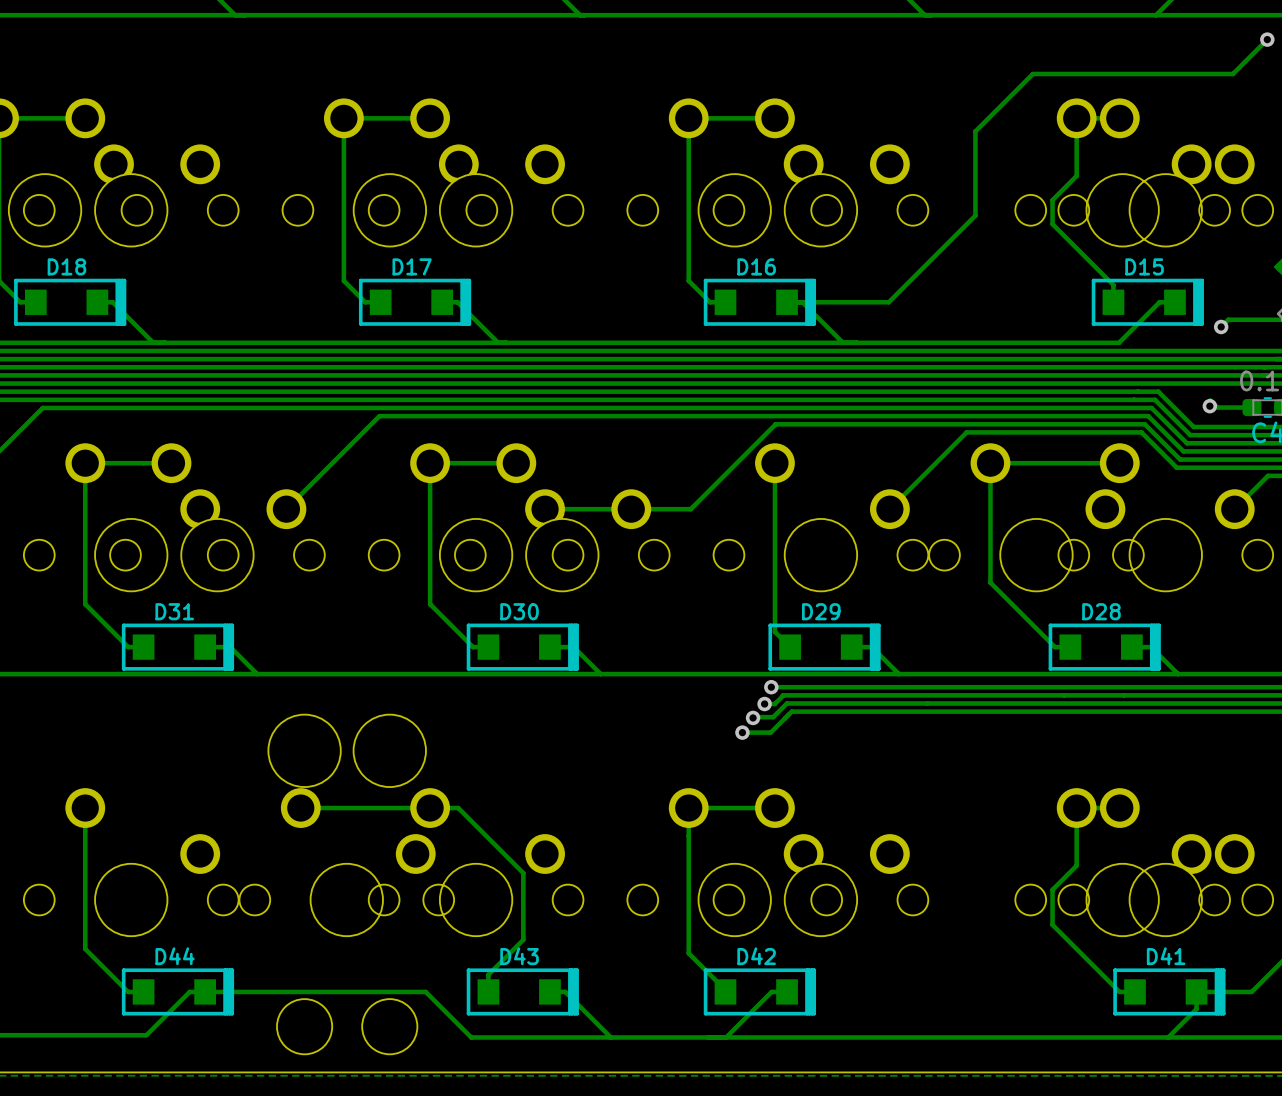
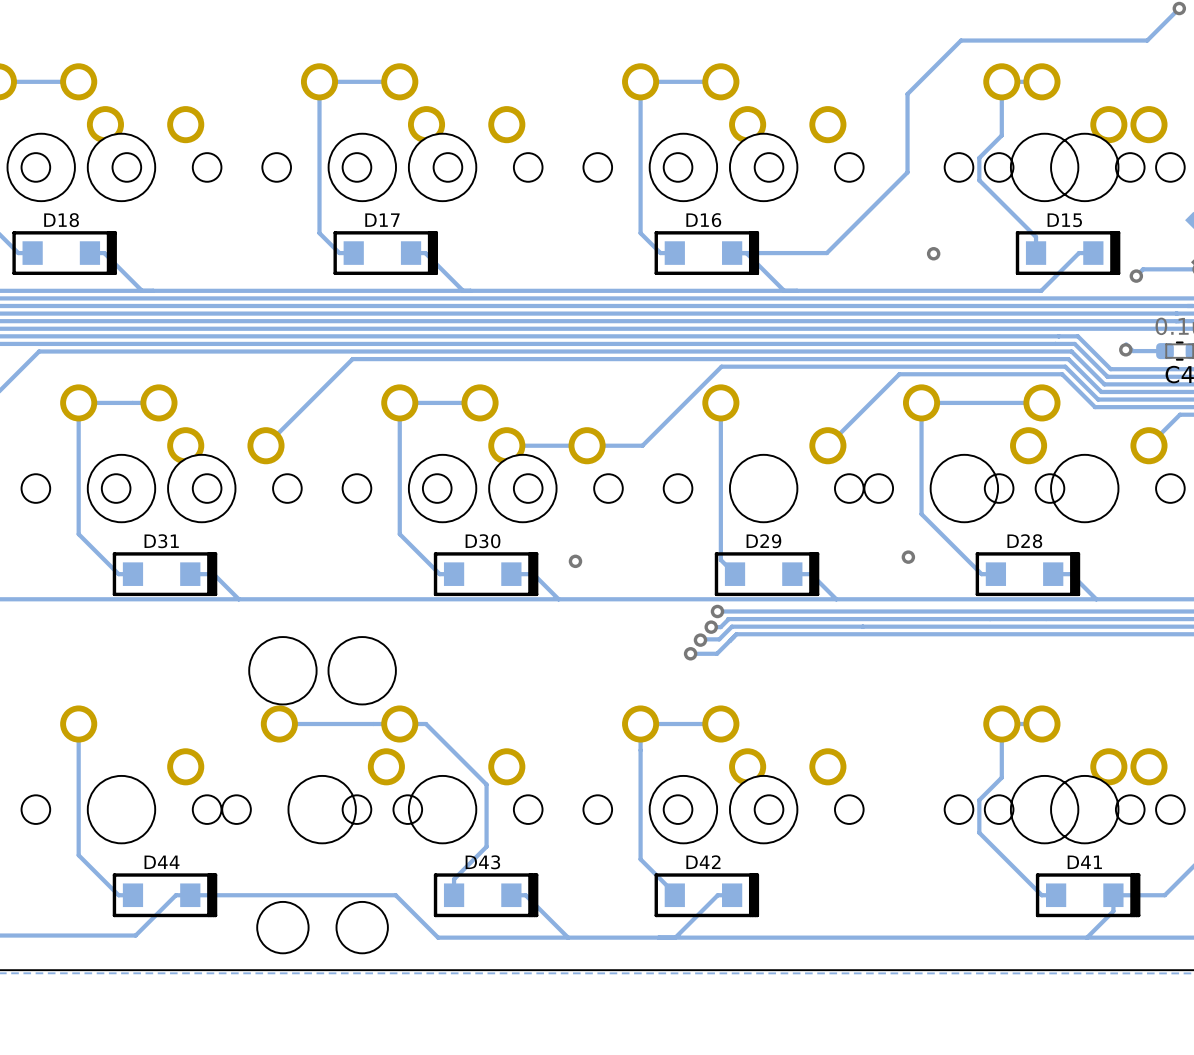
via: none -> (933, 253)
via: none -> (908, 557)
via: none -> (575, 561)

